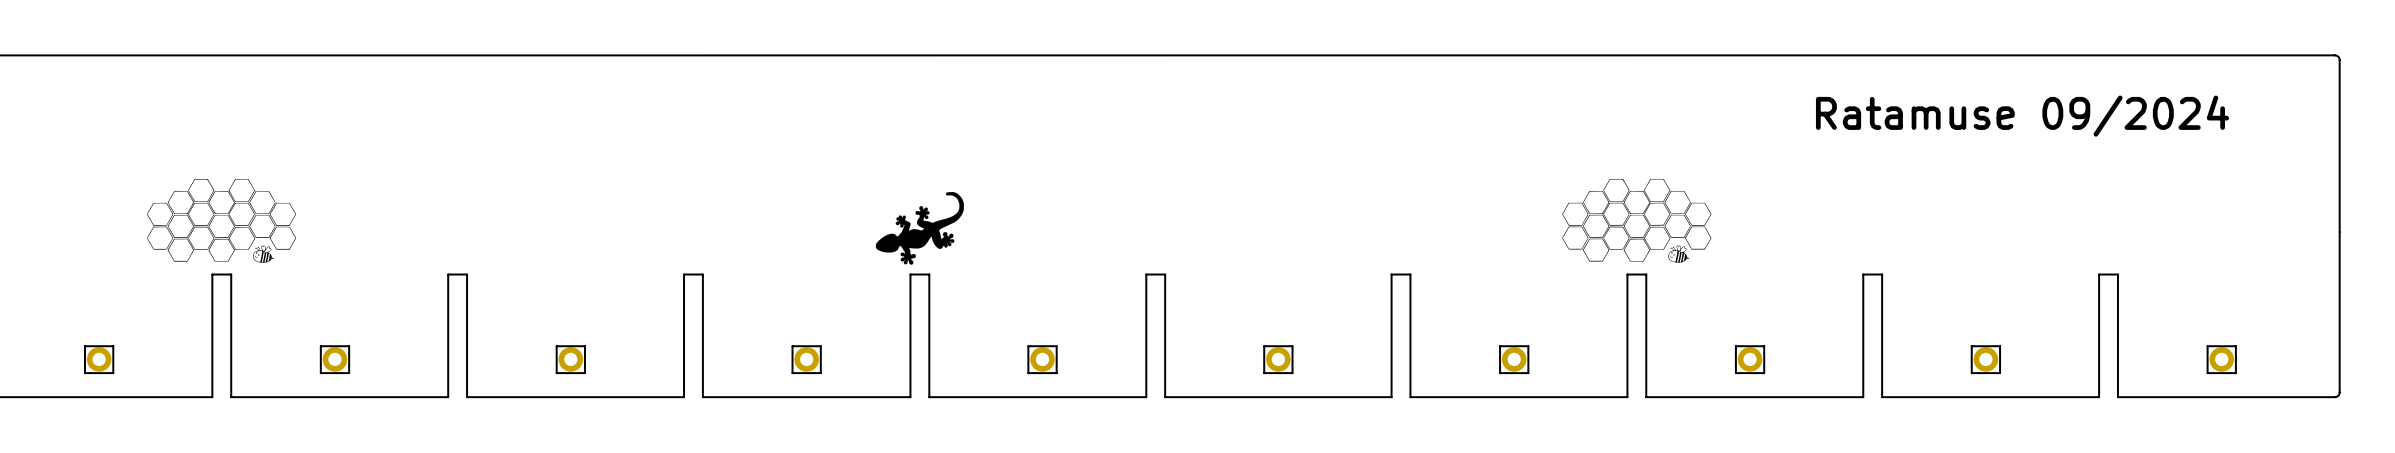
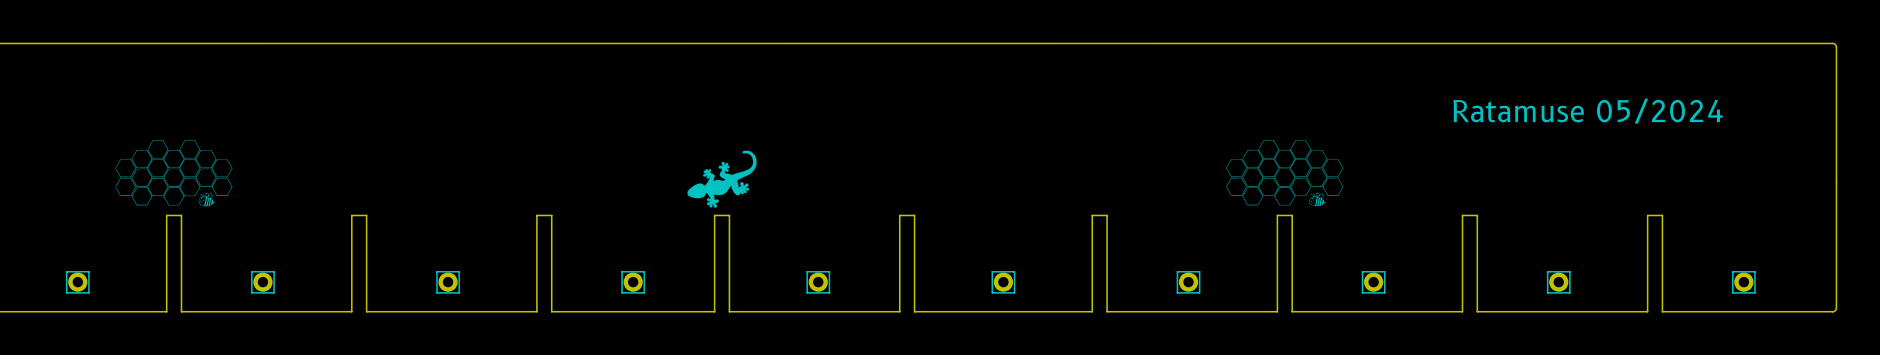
text: Ratamuse 09/2024 (2022, 116) -> Ratamuse 05/2024 (1588, 111)

